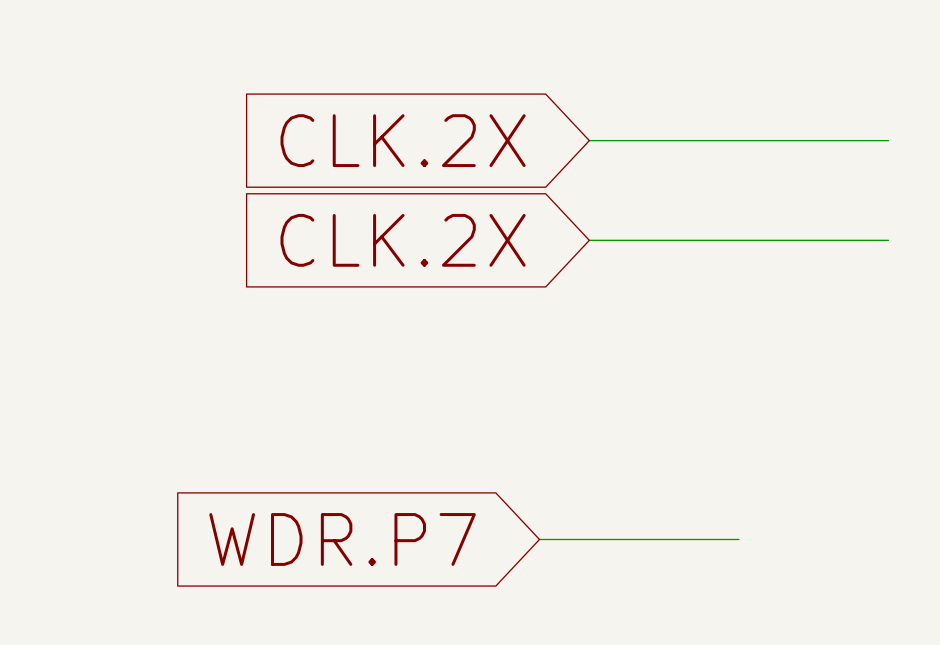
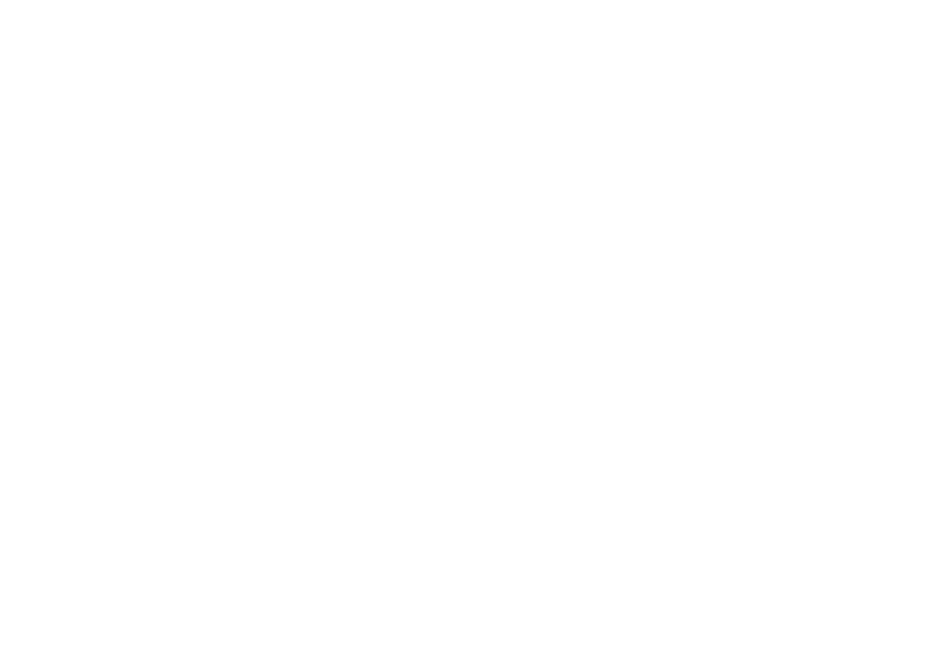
global label: CLK.2X (403, 140) -> none
wire: (589, 140) (888, 140) -> none
global label: CLK.2X (403, 240) -> none
wire: (589, 240) (888, 240) -> none
global label: WDR.P7 (342, 539) -> none
wire: (539, 539) (738, 539) -> none

